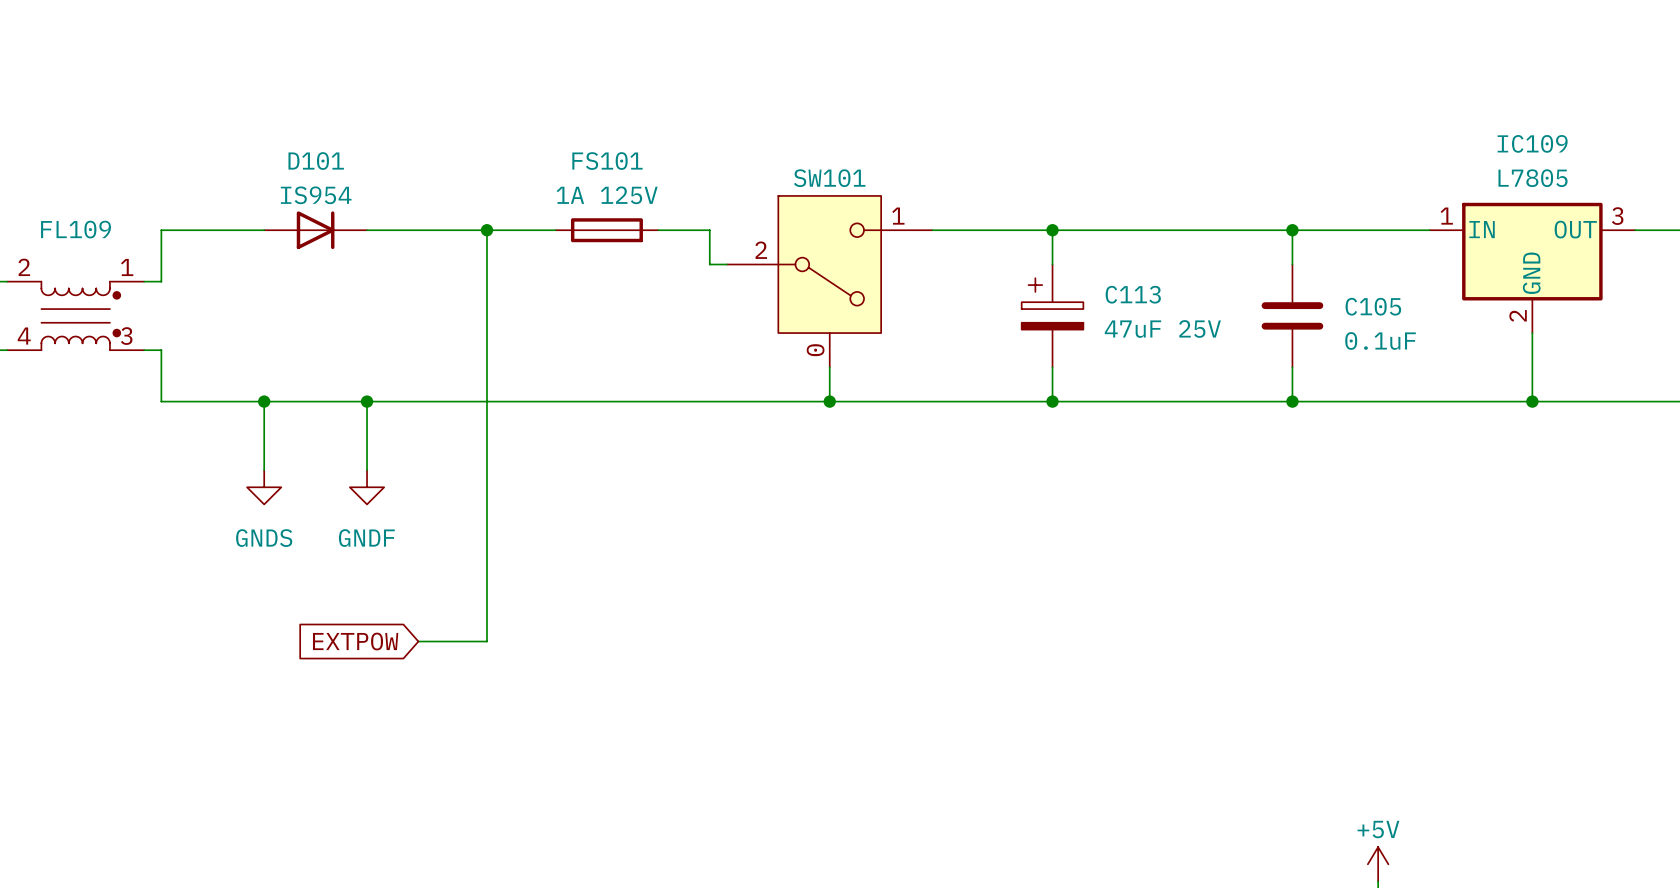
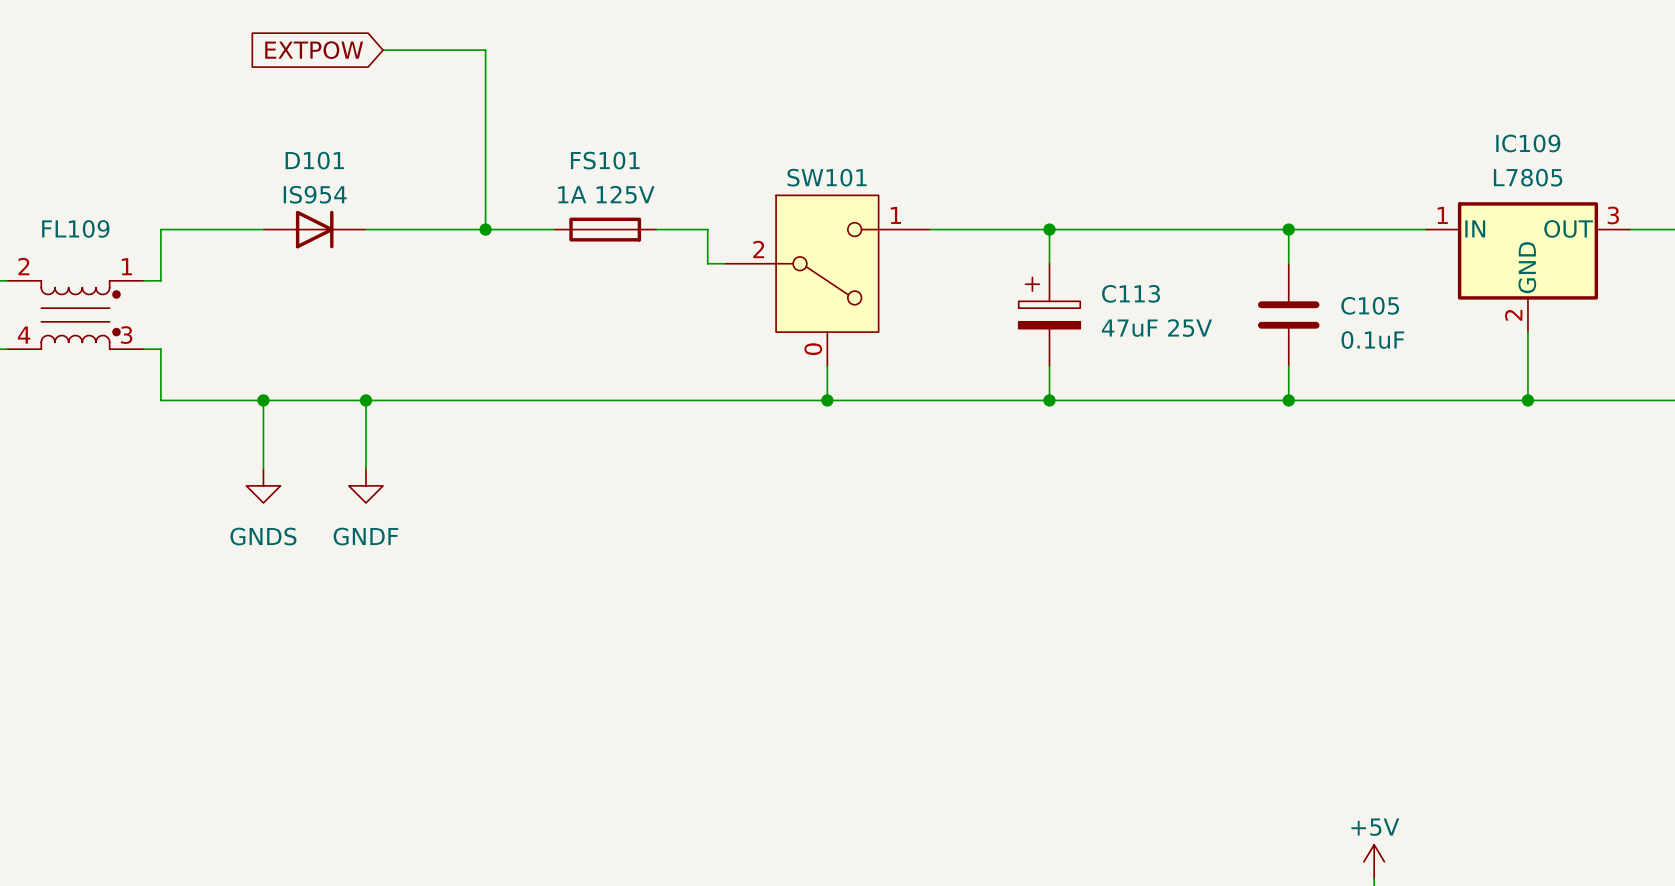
global label: none -> EXTPOW (314, 50)
wire: (486, 230) (486, 641) (418, 641) -> (485, 229) (485, 50) (383, 50)
global label: EXTPOW (355, 641) -> none

